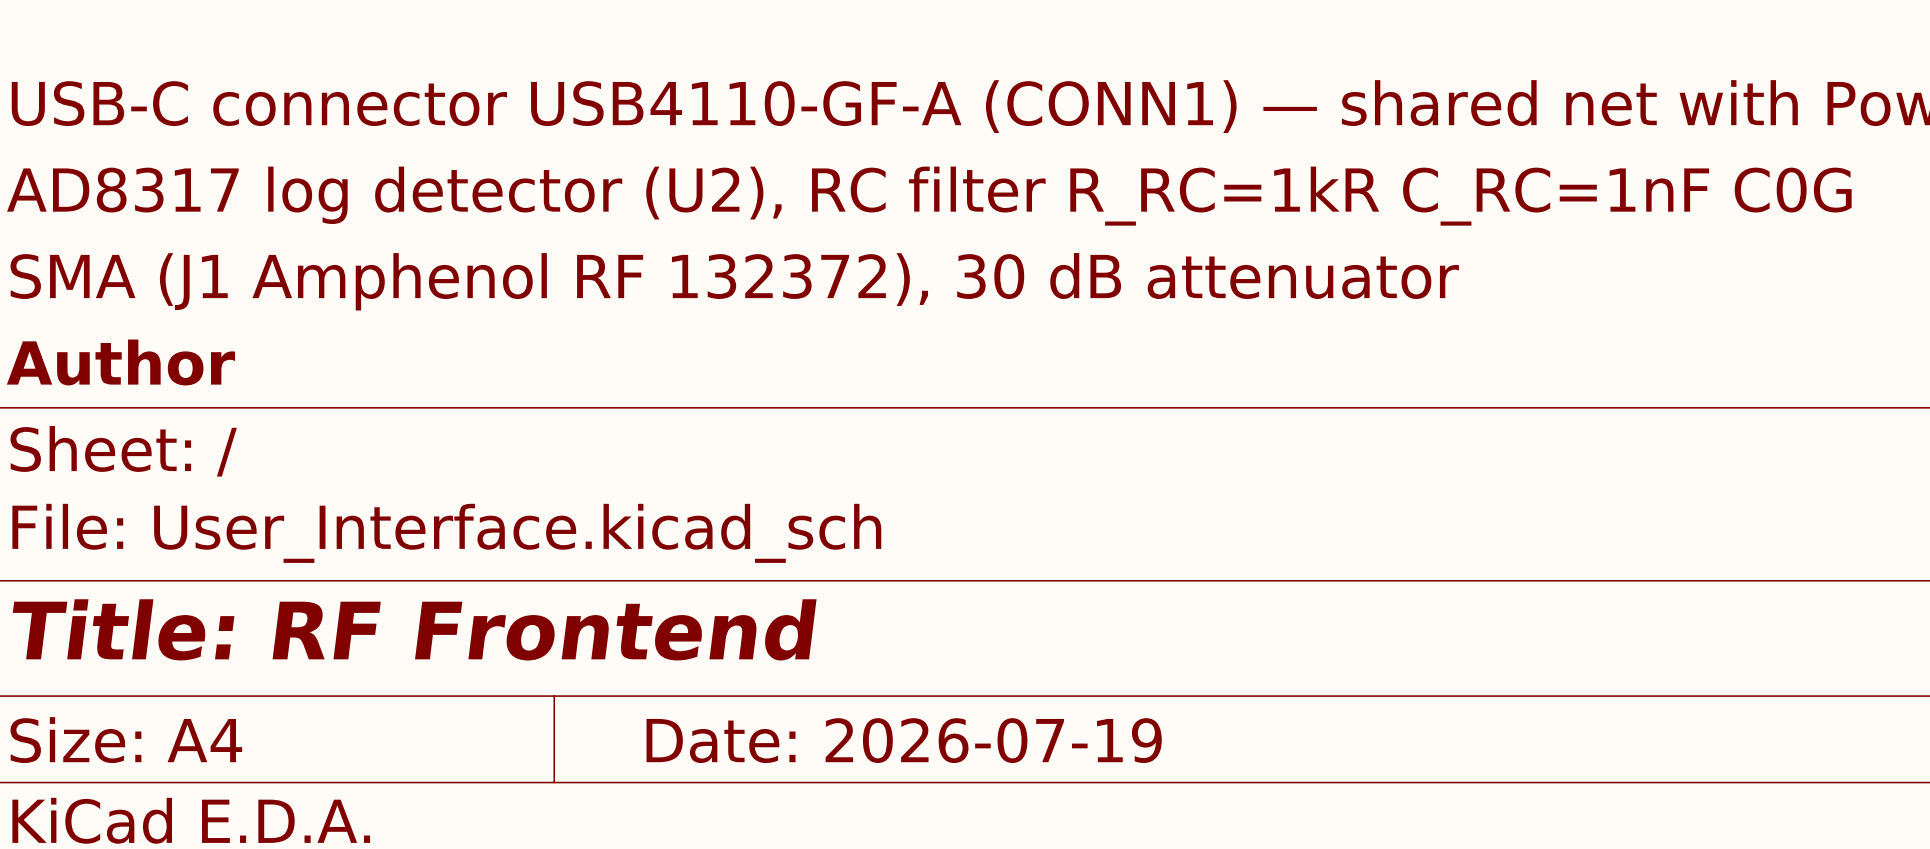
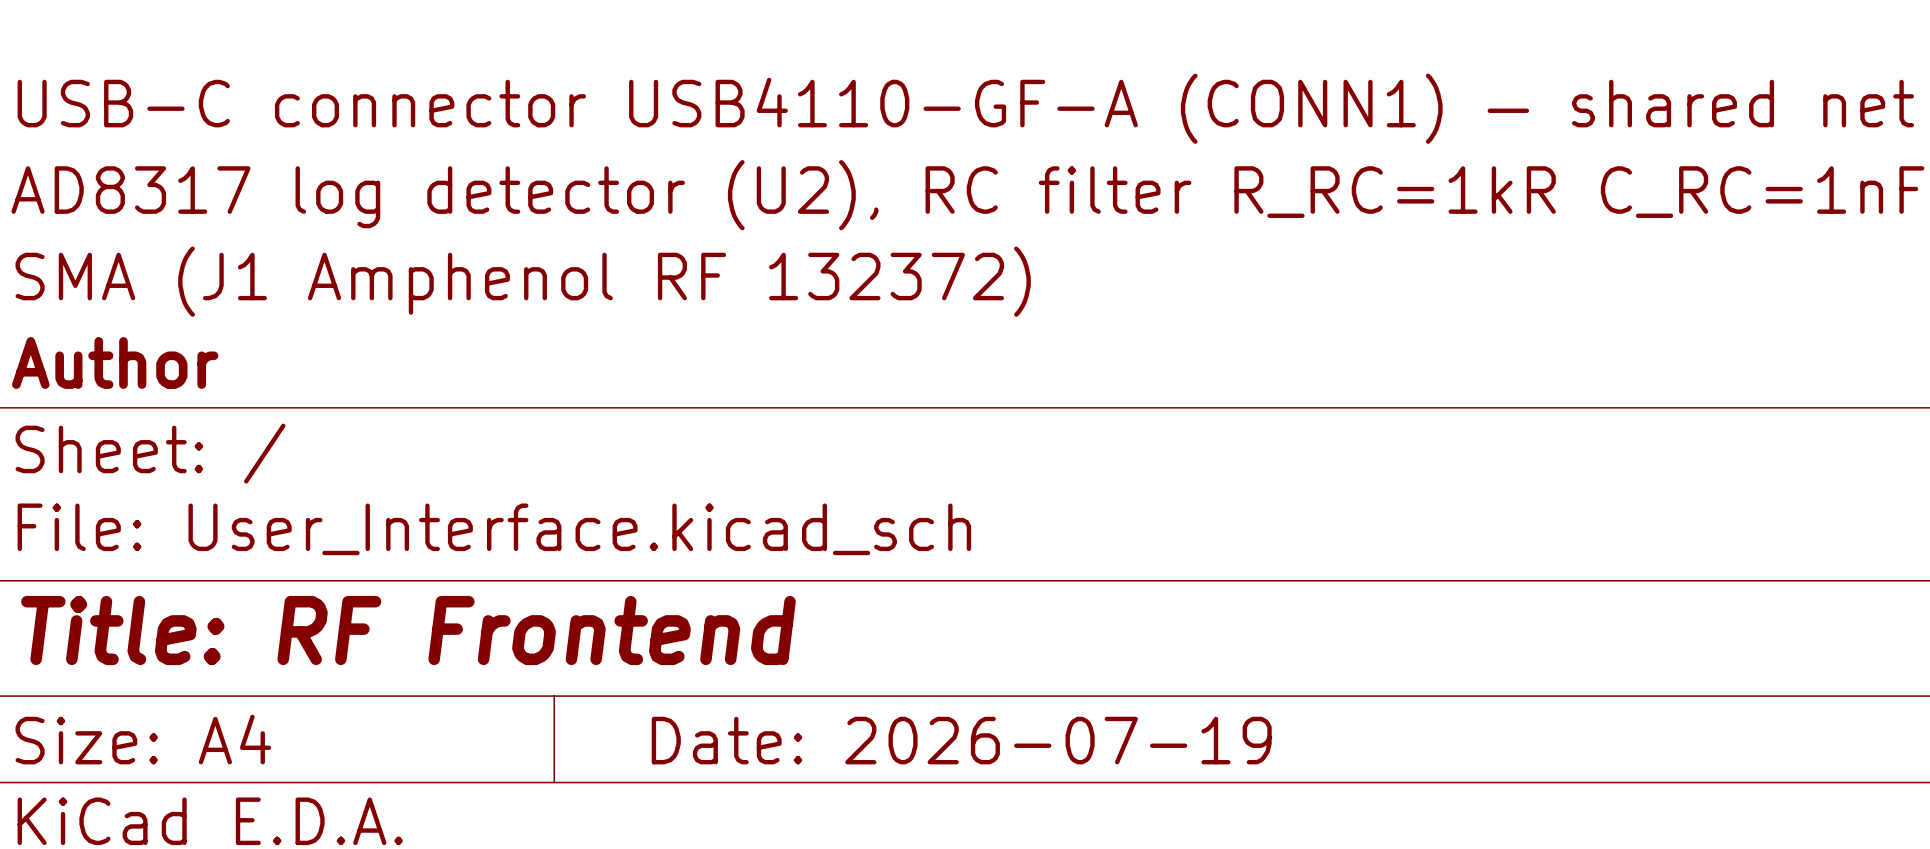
title block: SMA (J1 Amphenol RF 132372), 30 dB attenuator (734, 281) -> SMA (J1 Amphenol RF 132372) (523, 281)

